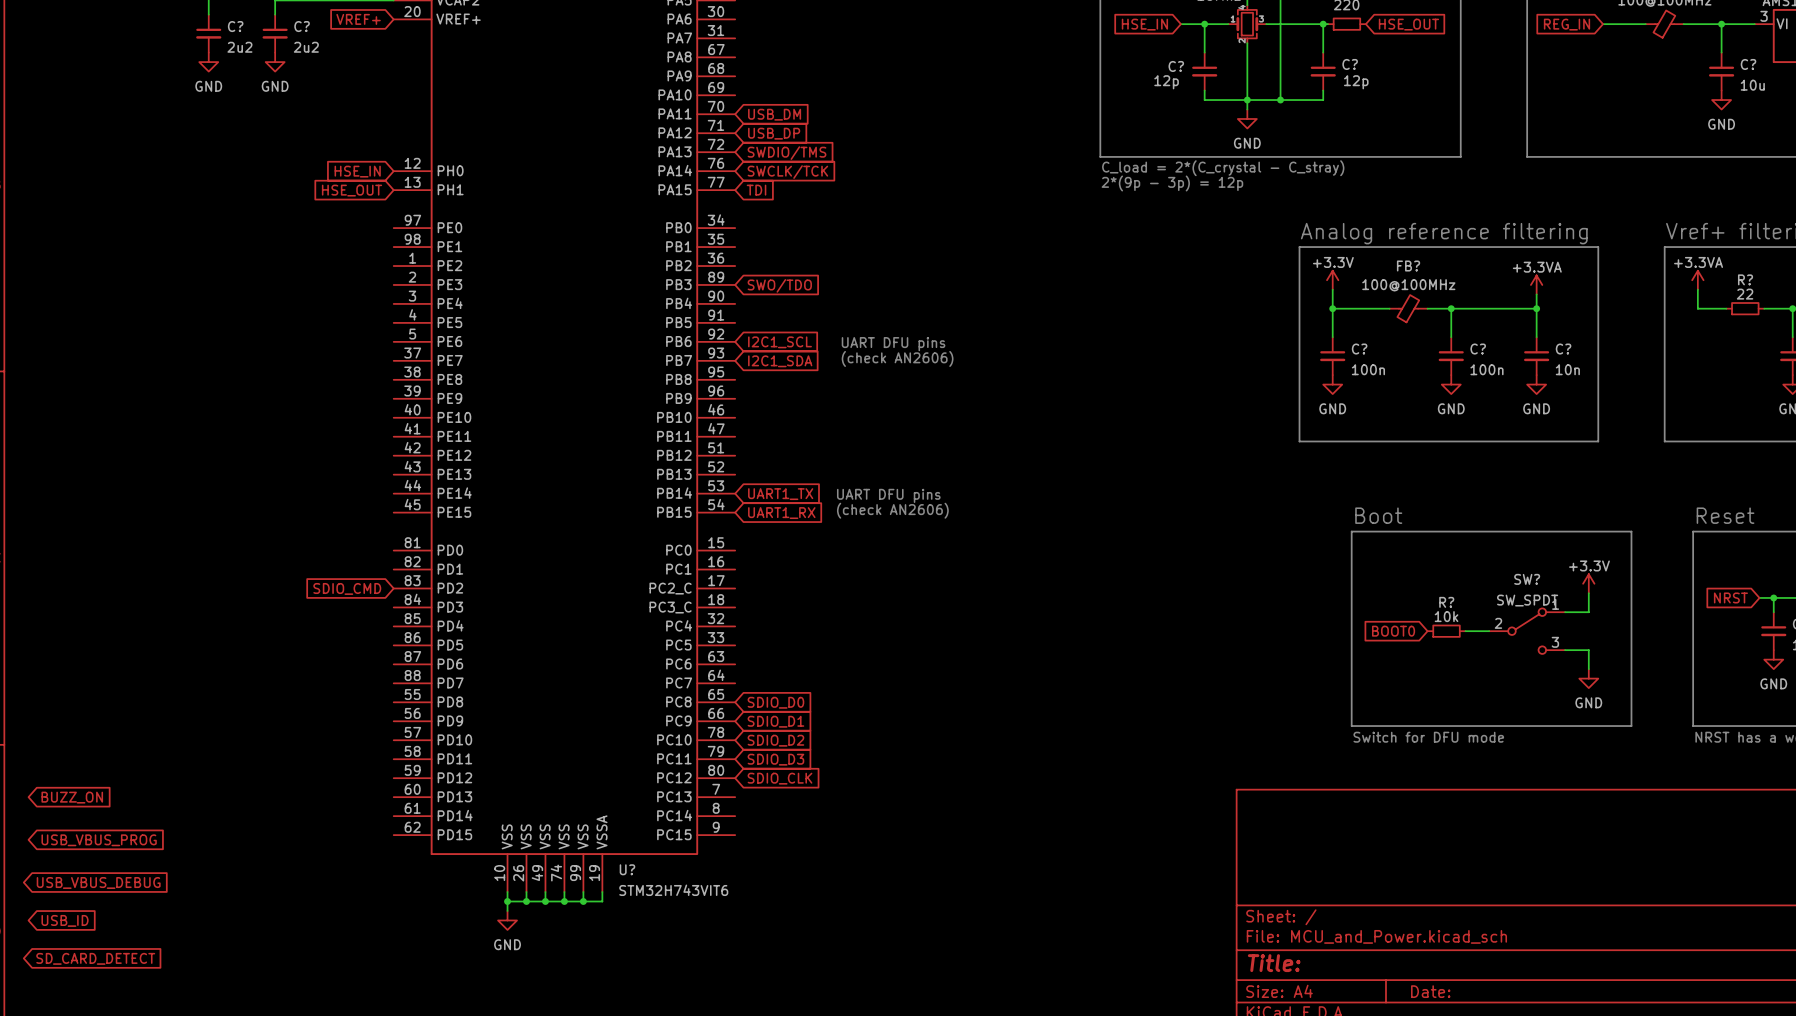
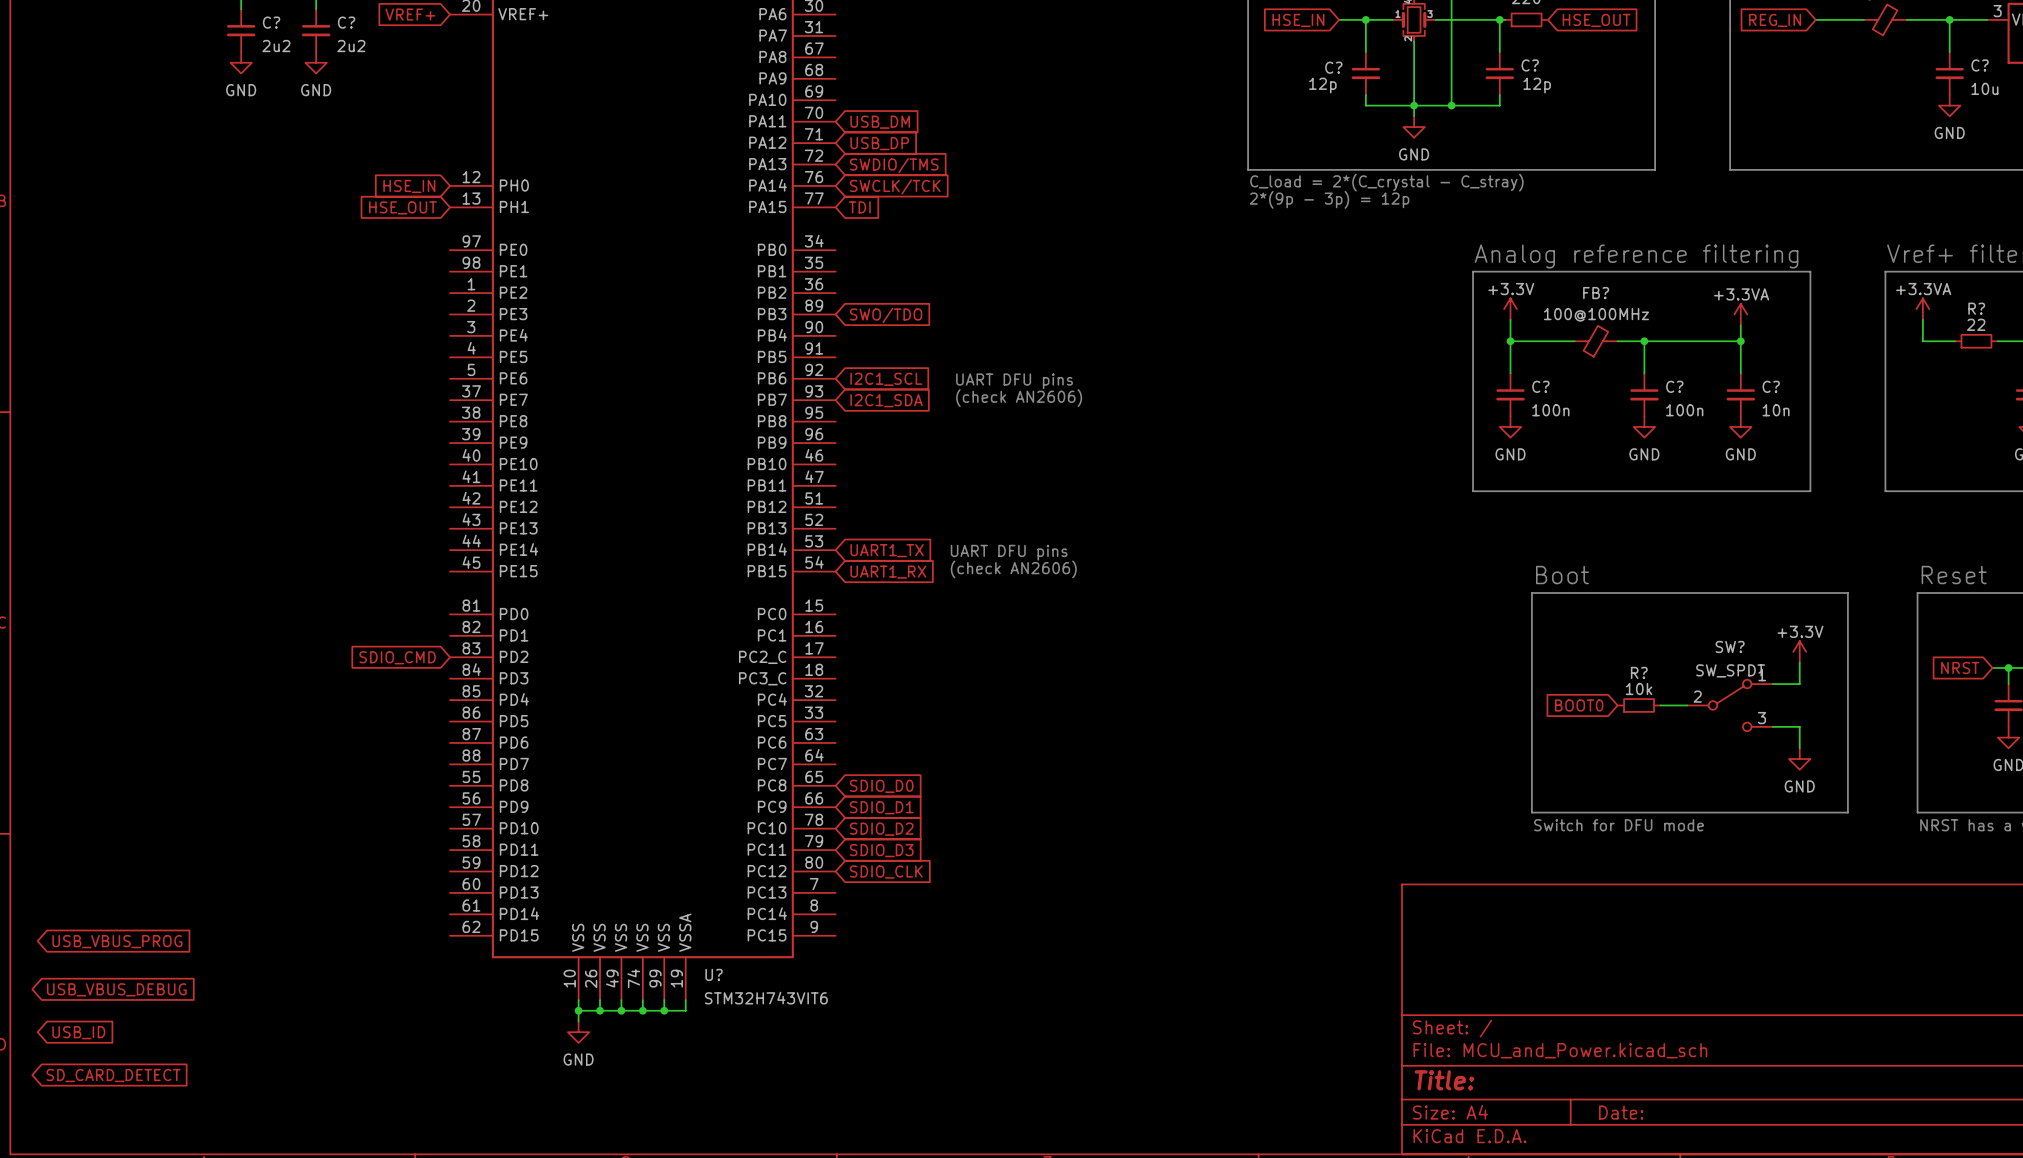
global label: BUZZ_ON (72, 797) -> none

